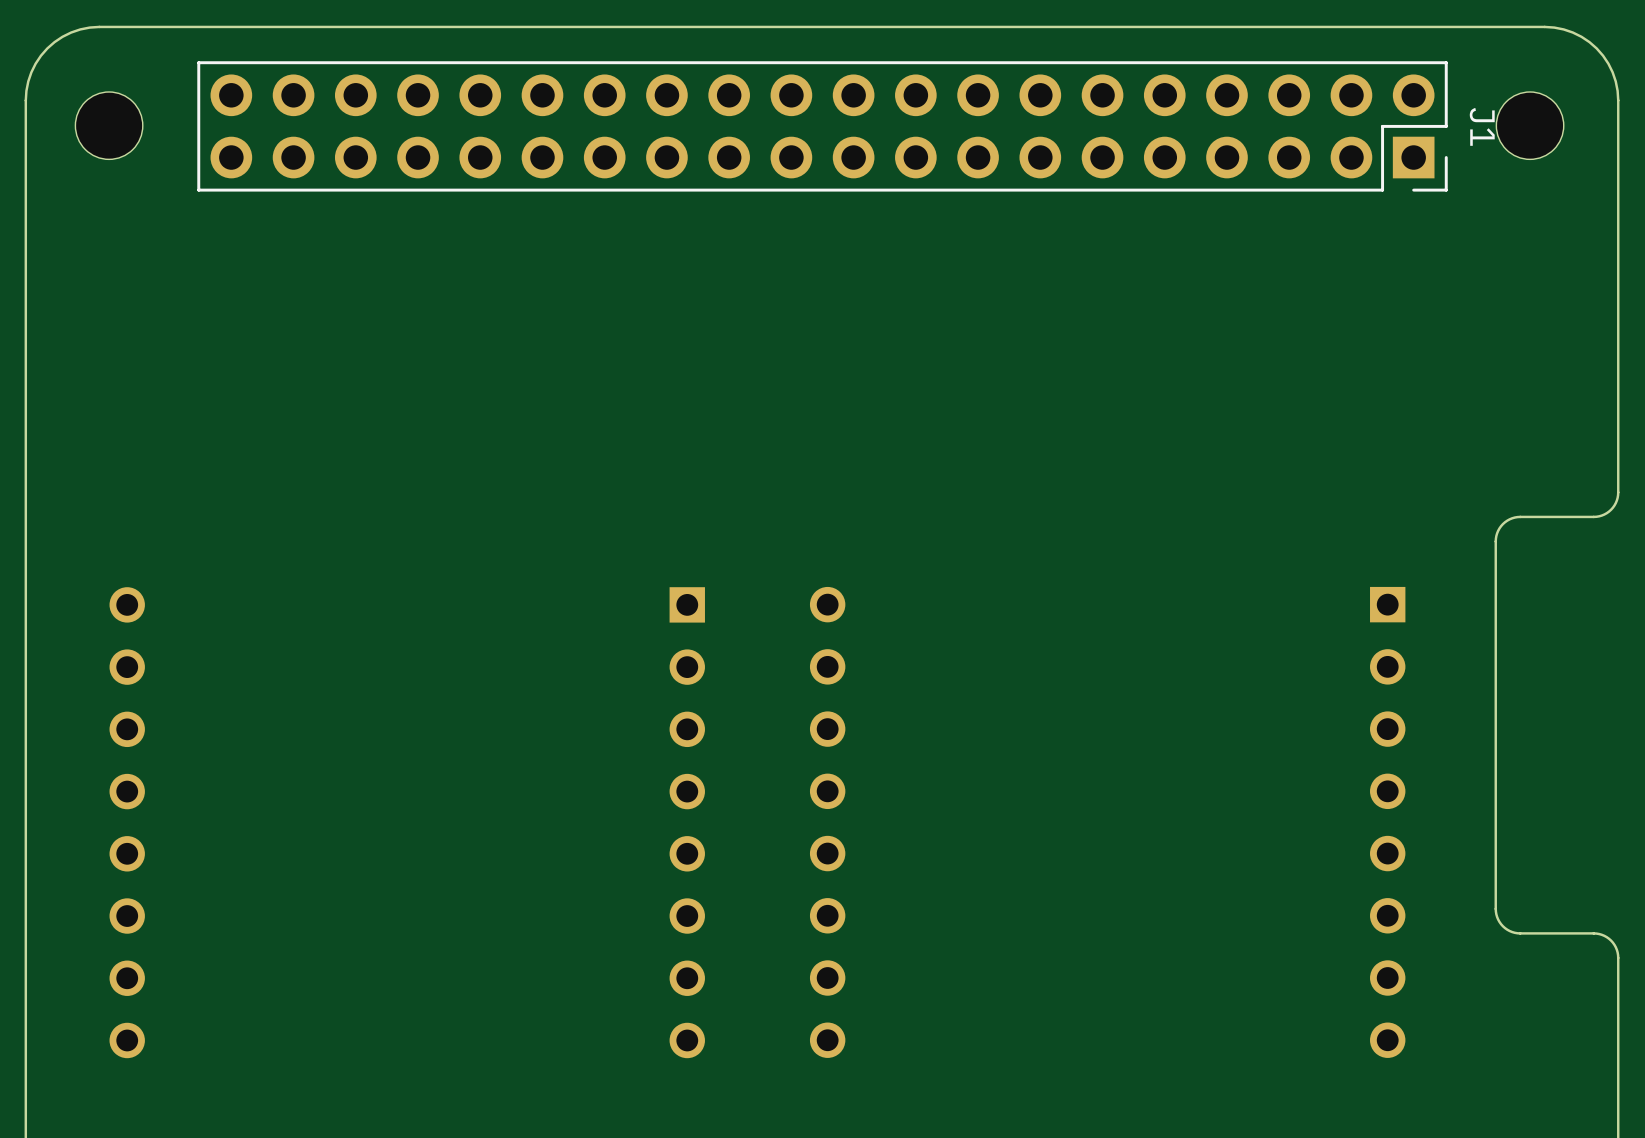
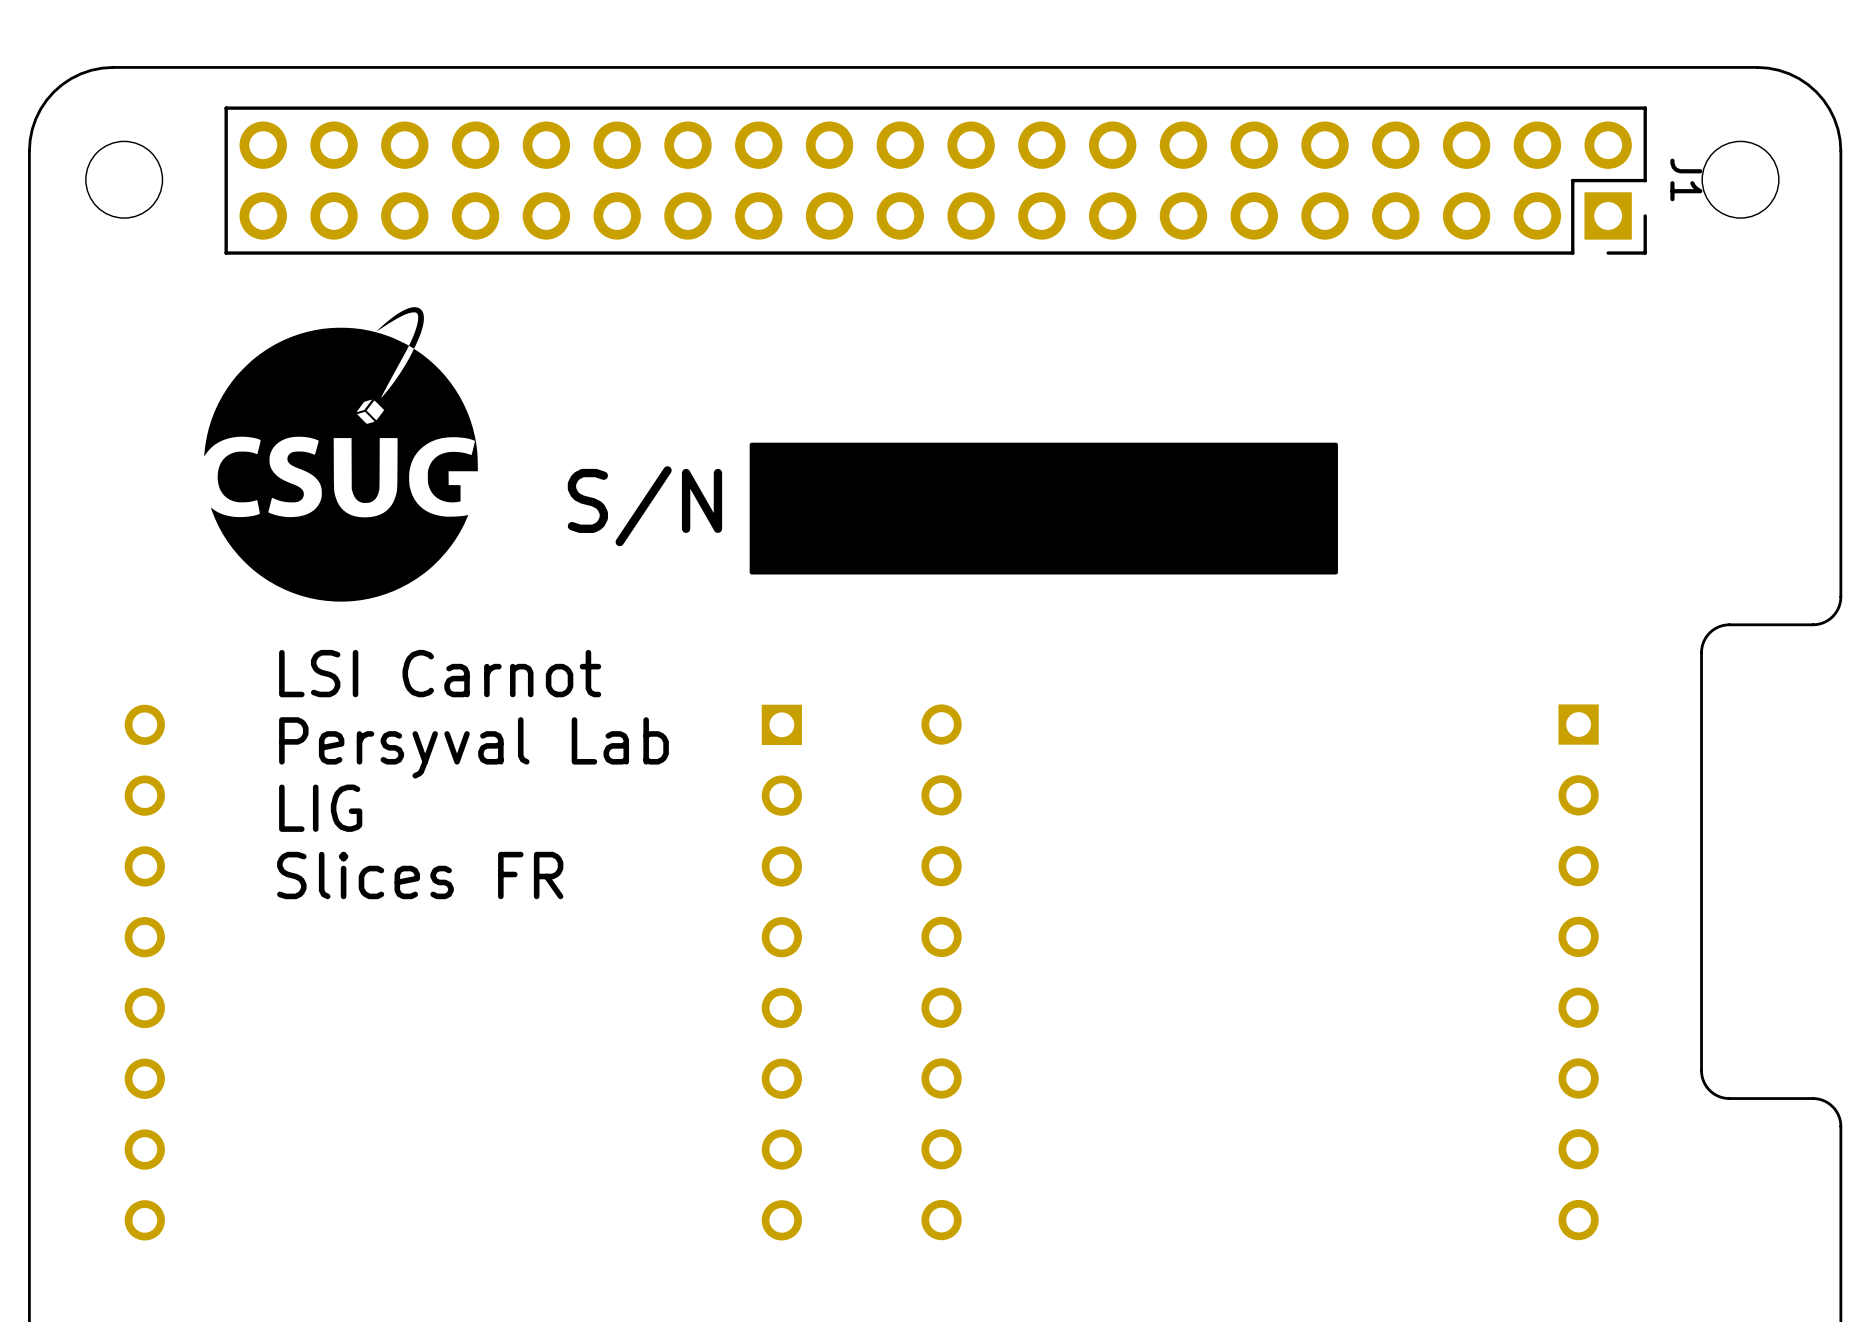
drawing: none -> [204, 307, 478, 602]
drawing: none -> [749, 442, 1338, 575]
text: none -> S/N (644, 506)
text: none -> LSI Carnot (440, 673)
text: none -> Persyval Lab (473, 747)
text: none -> LIG (320, 808)
text: none -> Slices FR (420, 875)

